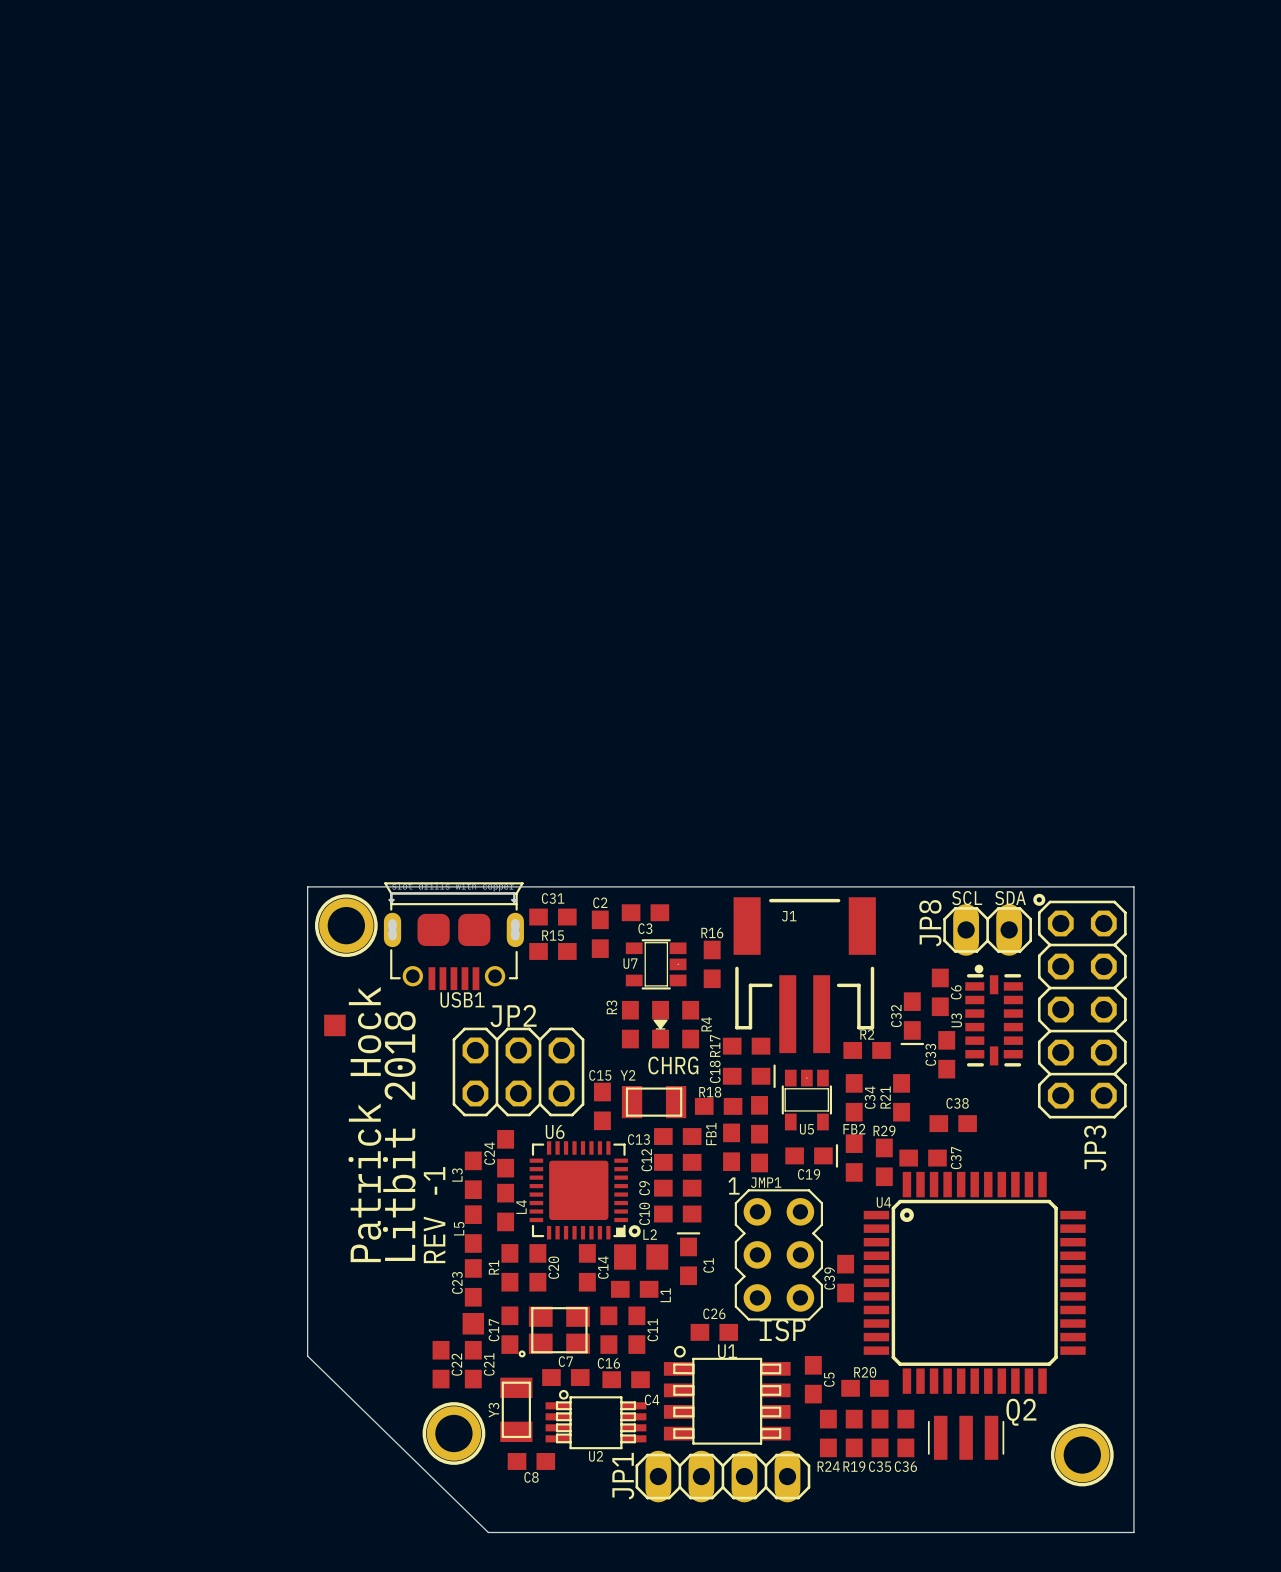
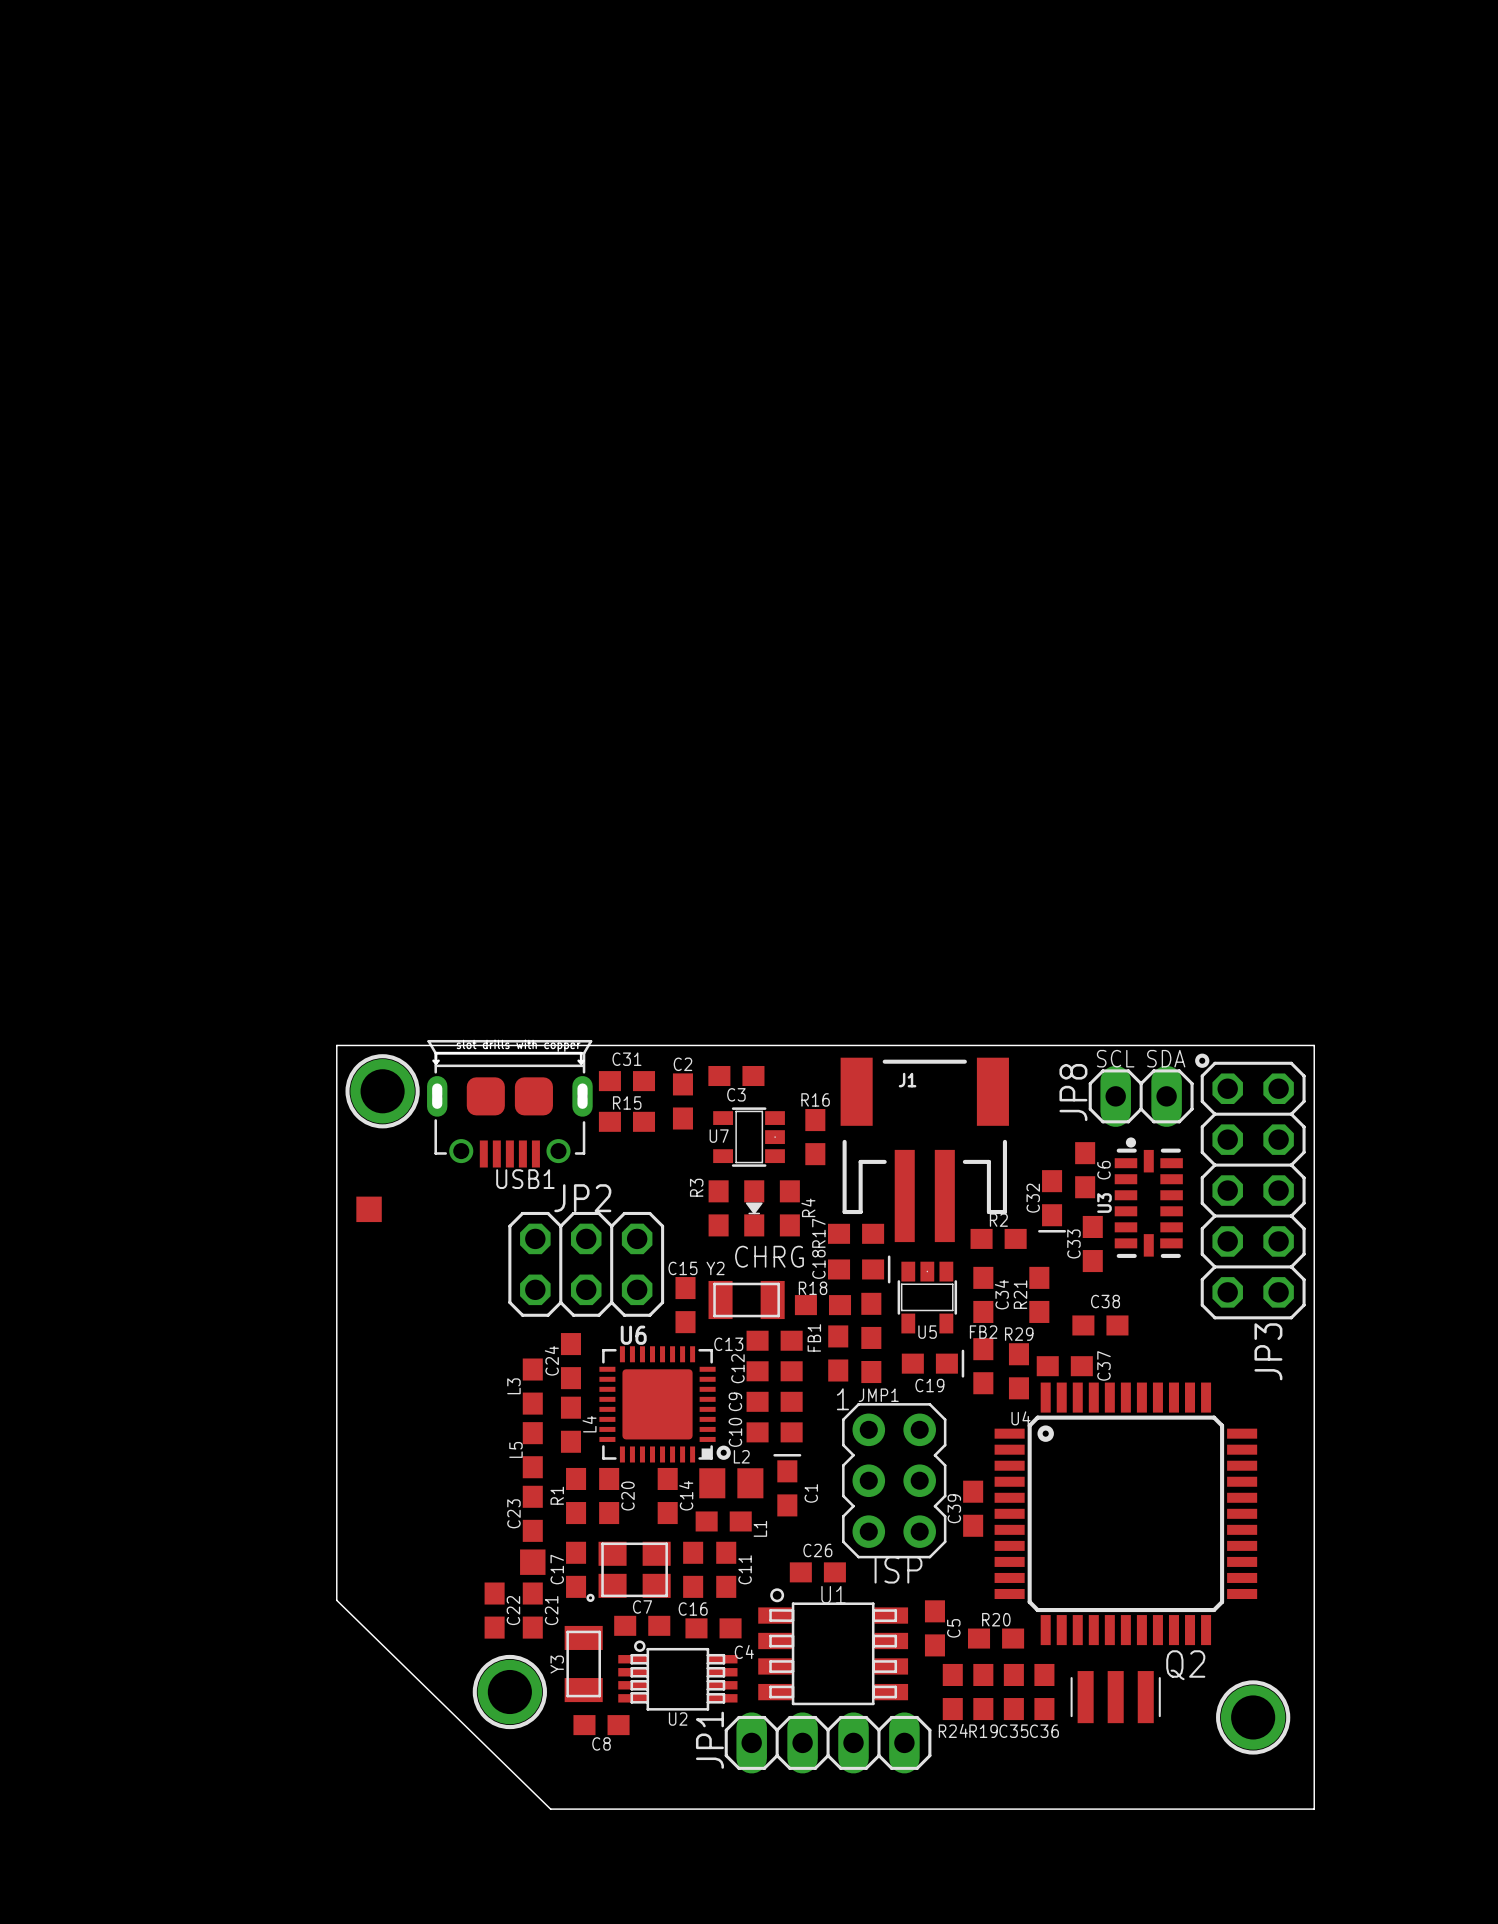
text: Patrick Hock (364, 1124) -> none
text: Litbit 2018 (399, 1136) -> none
text: REV -1 (434, 1215) -> none

